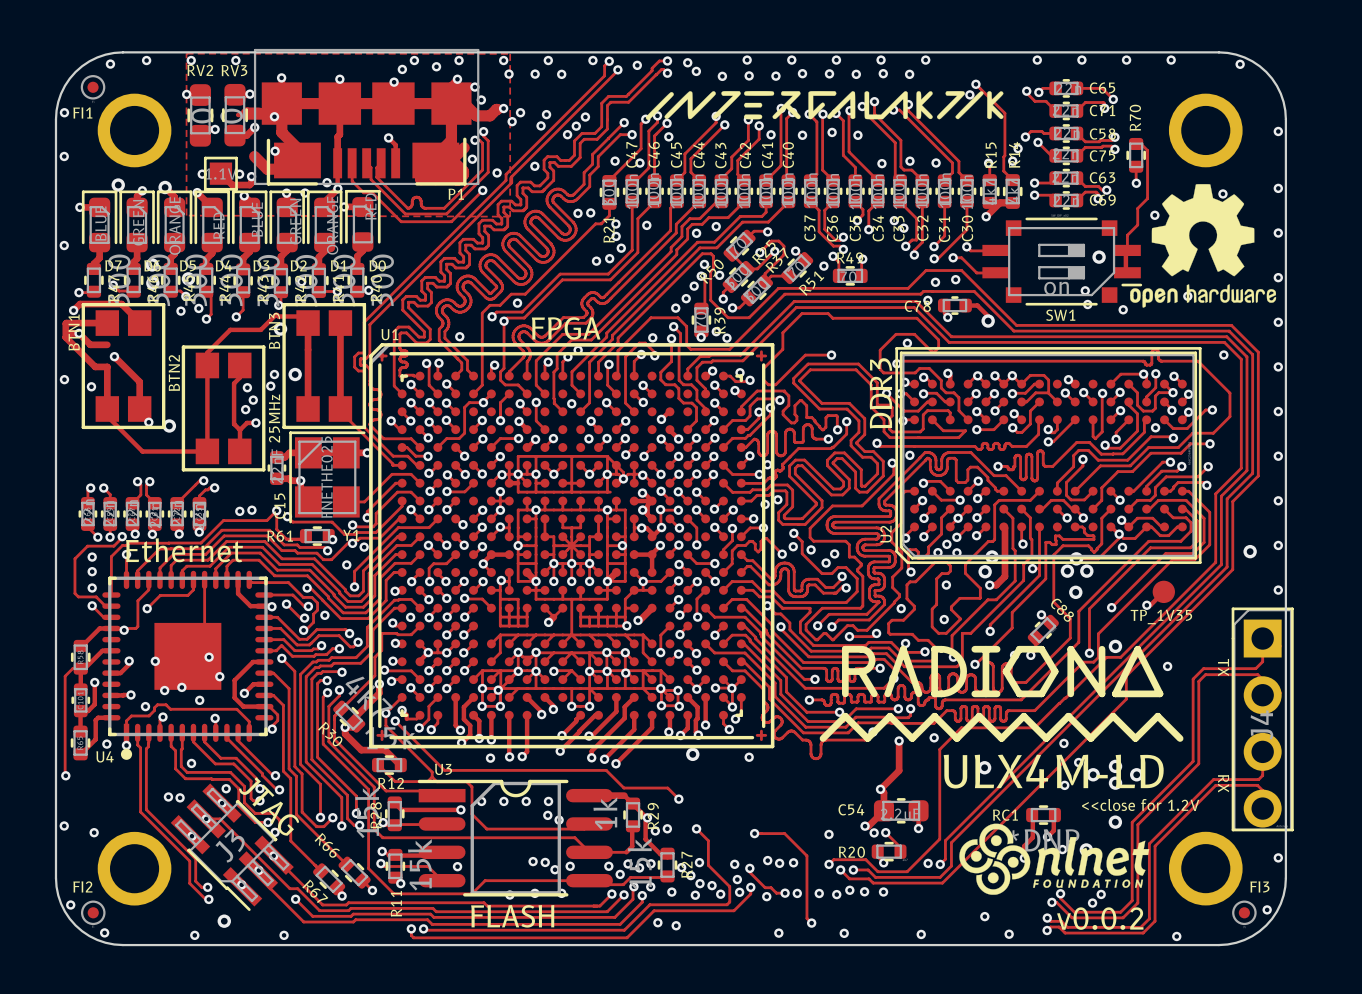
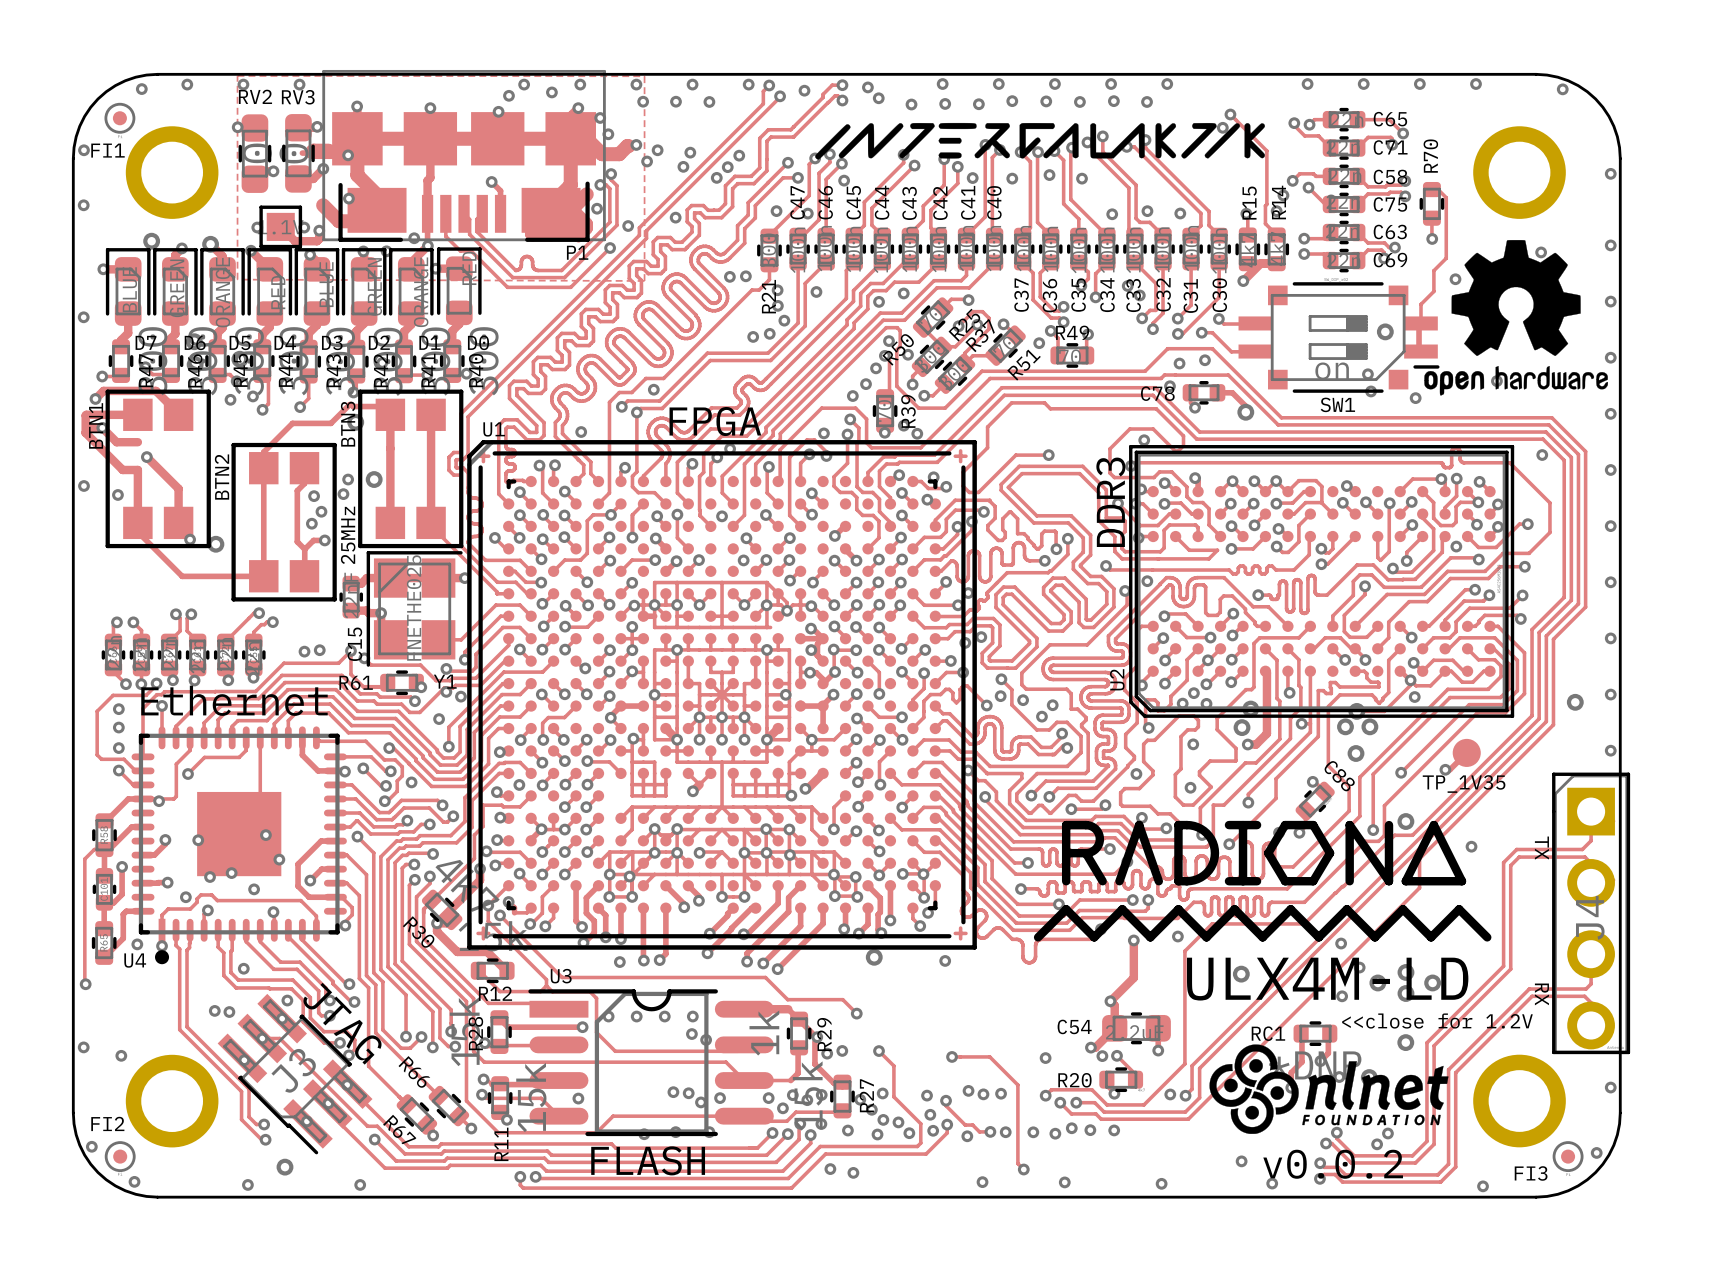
FI3 name position: FI3 (1259, 886) -> FI3 (1531, 1173)
text position: v0.0.2 (1100, 918) -> v0.0.2 (1333, 1164)

